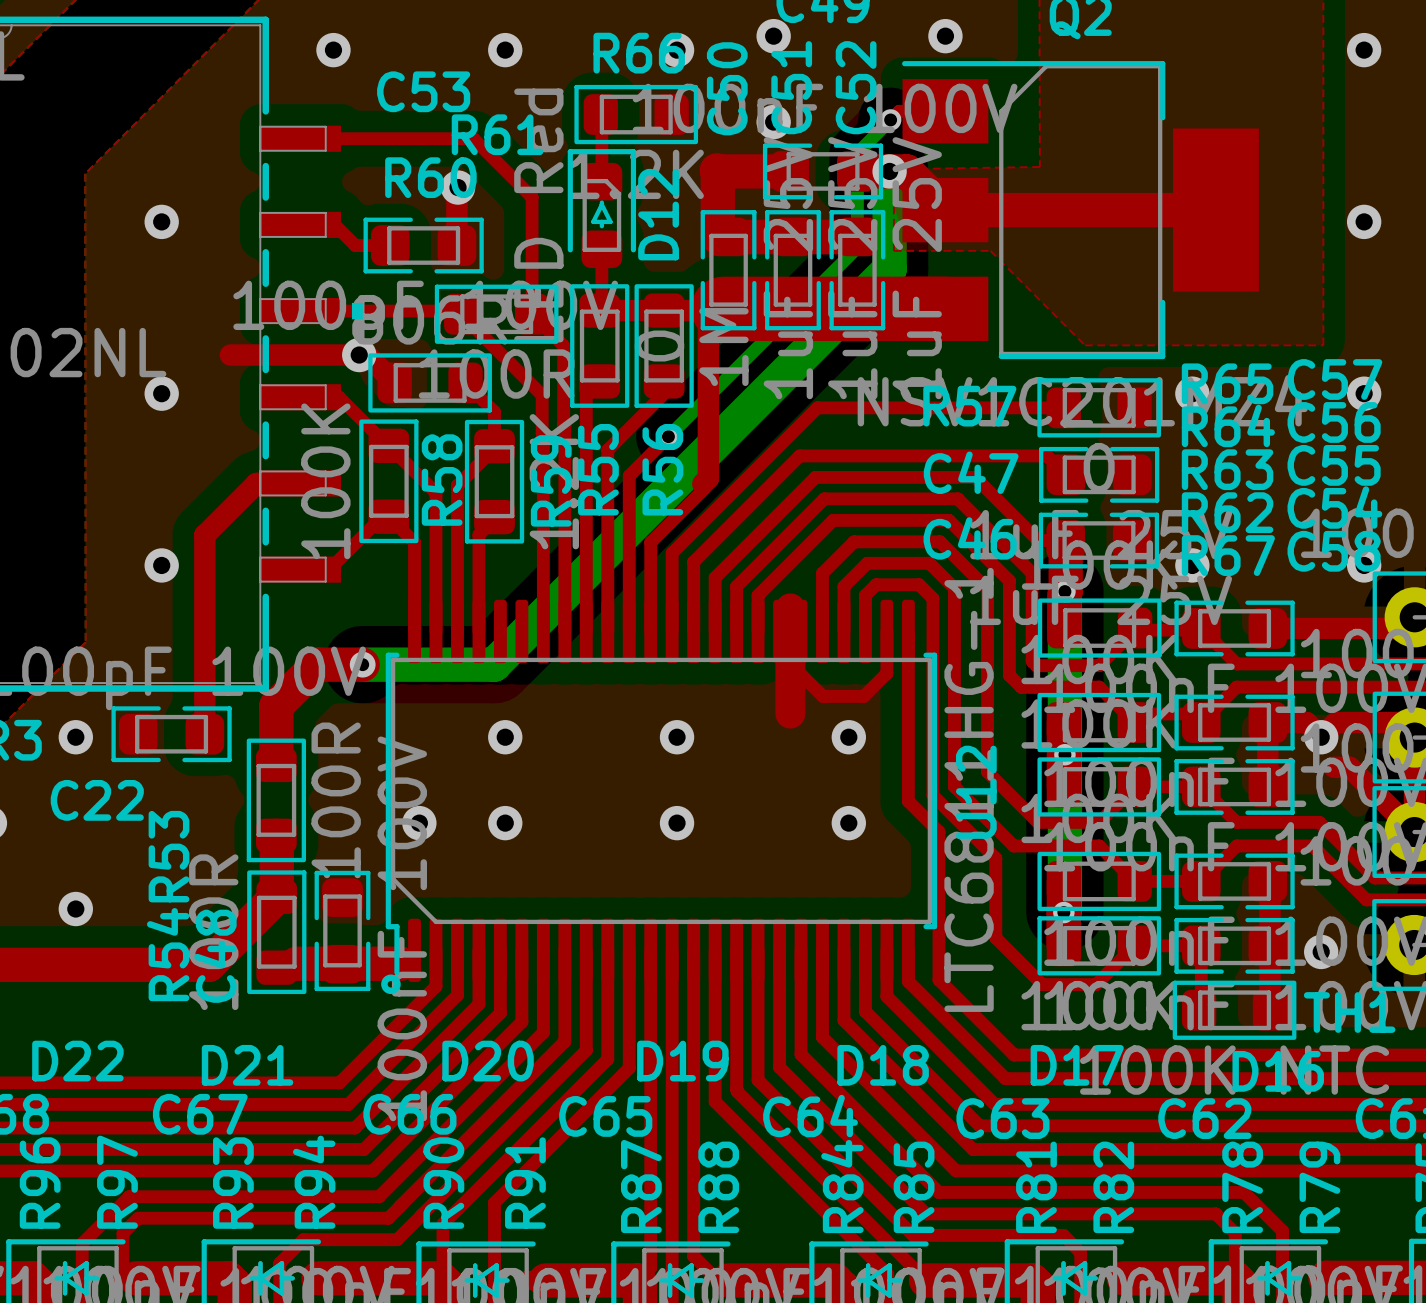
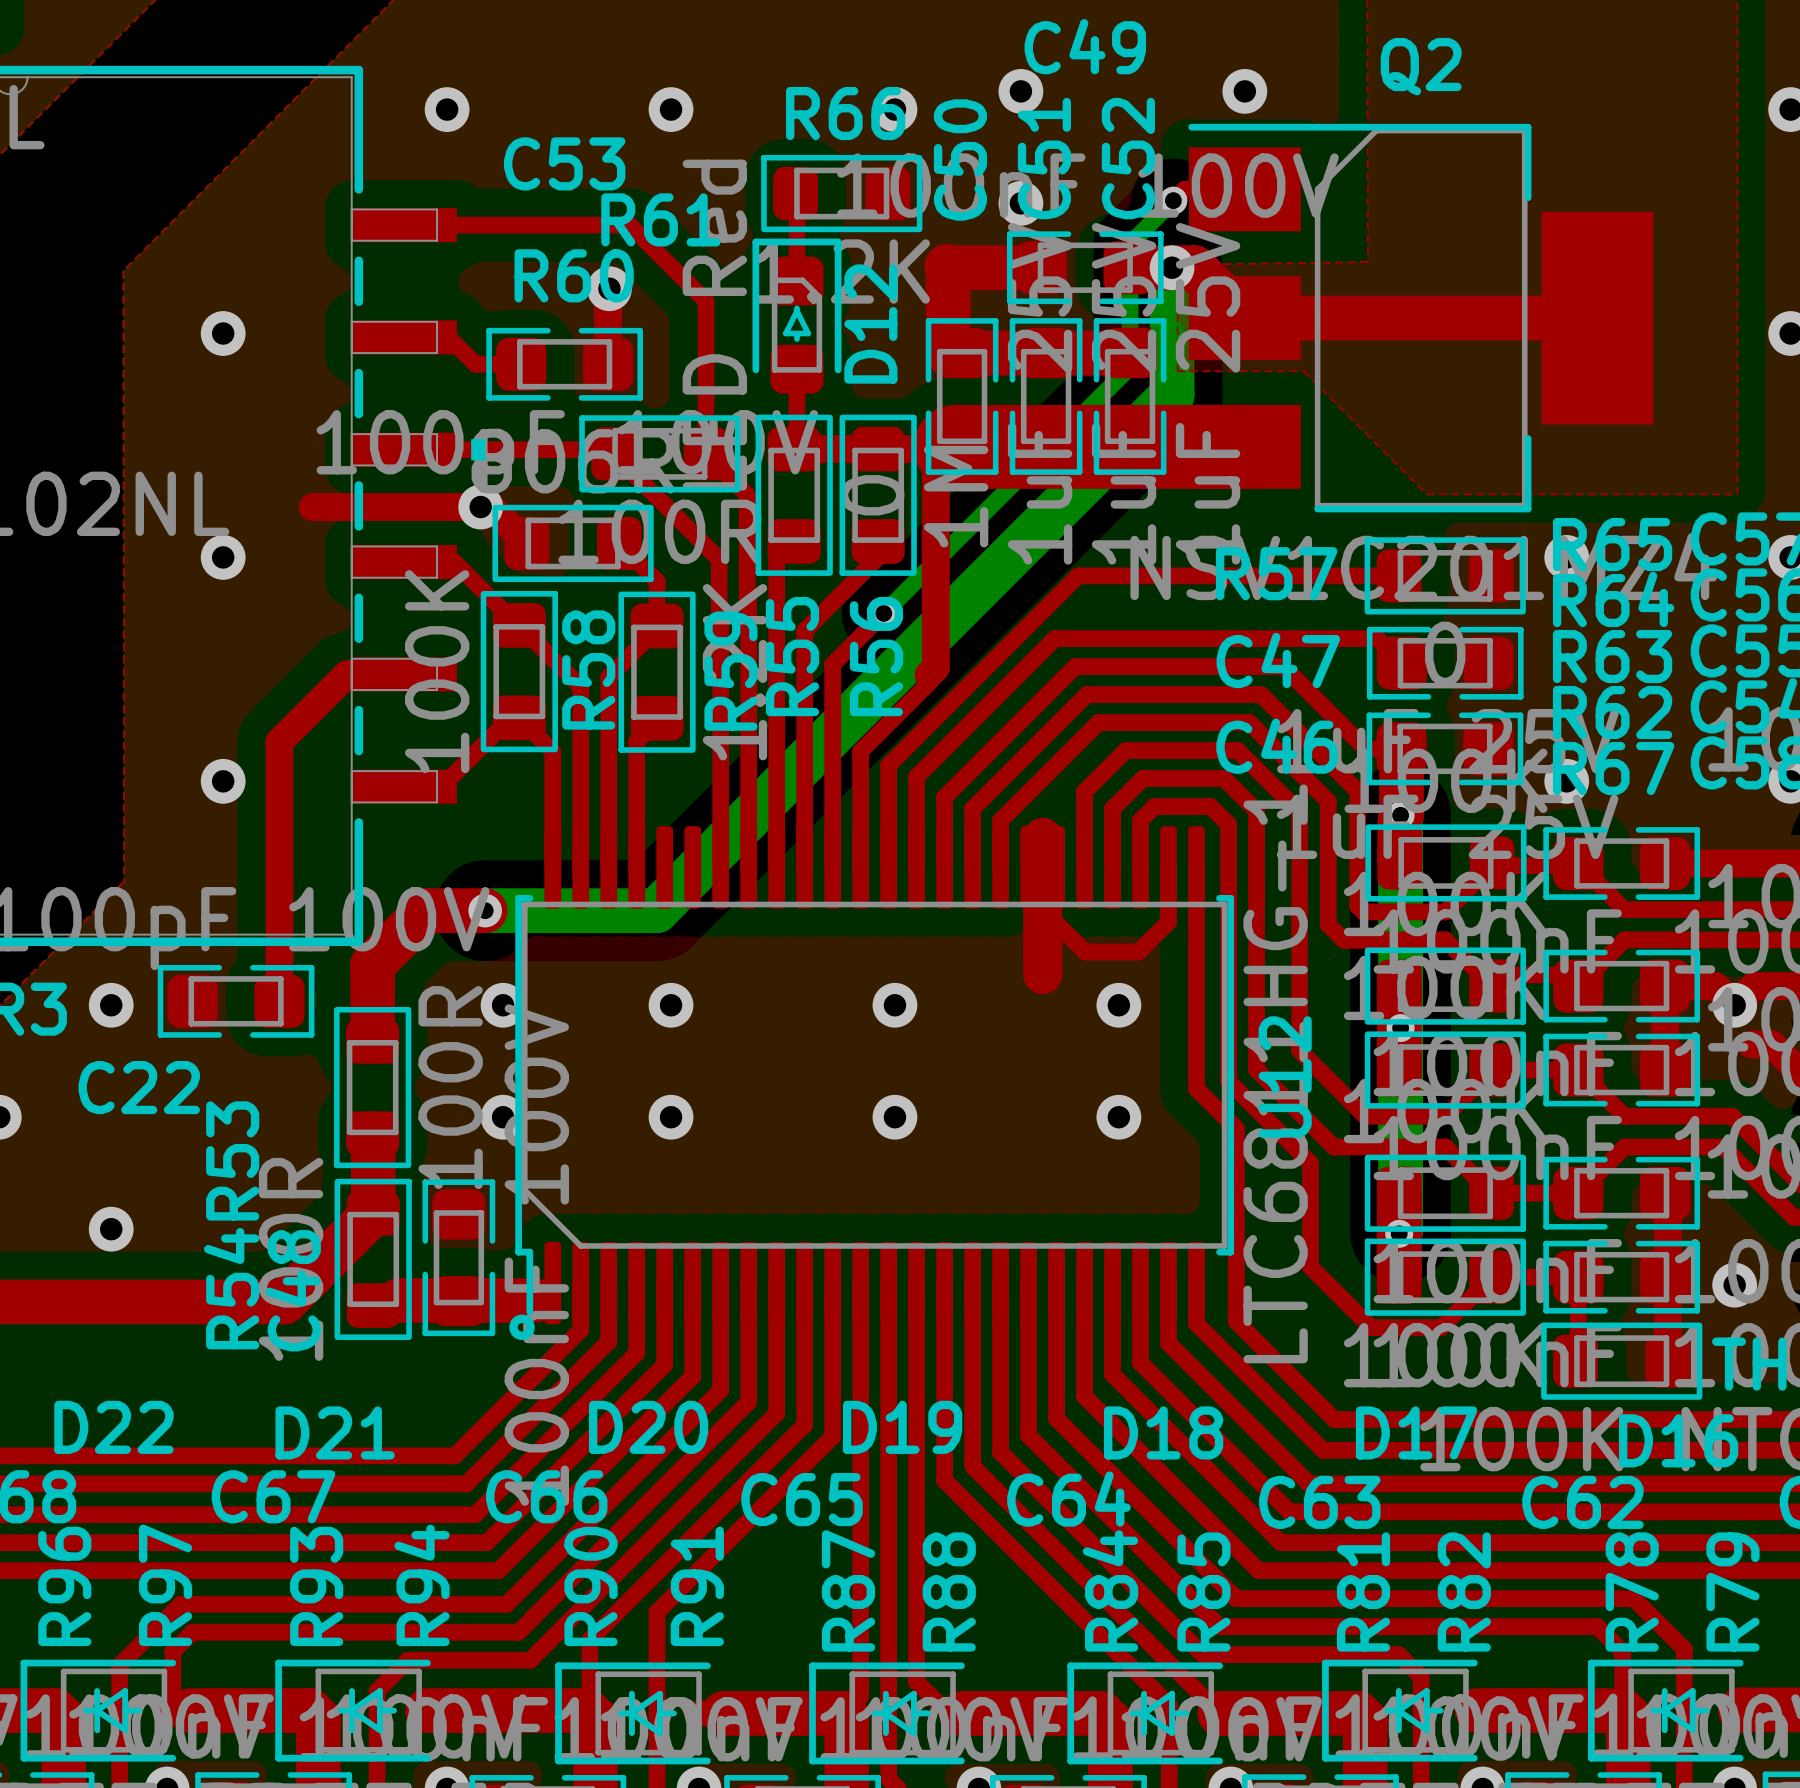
via: none -> (503, 1005)
via position: (419, 823) -> (503, 1117)

